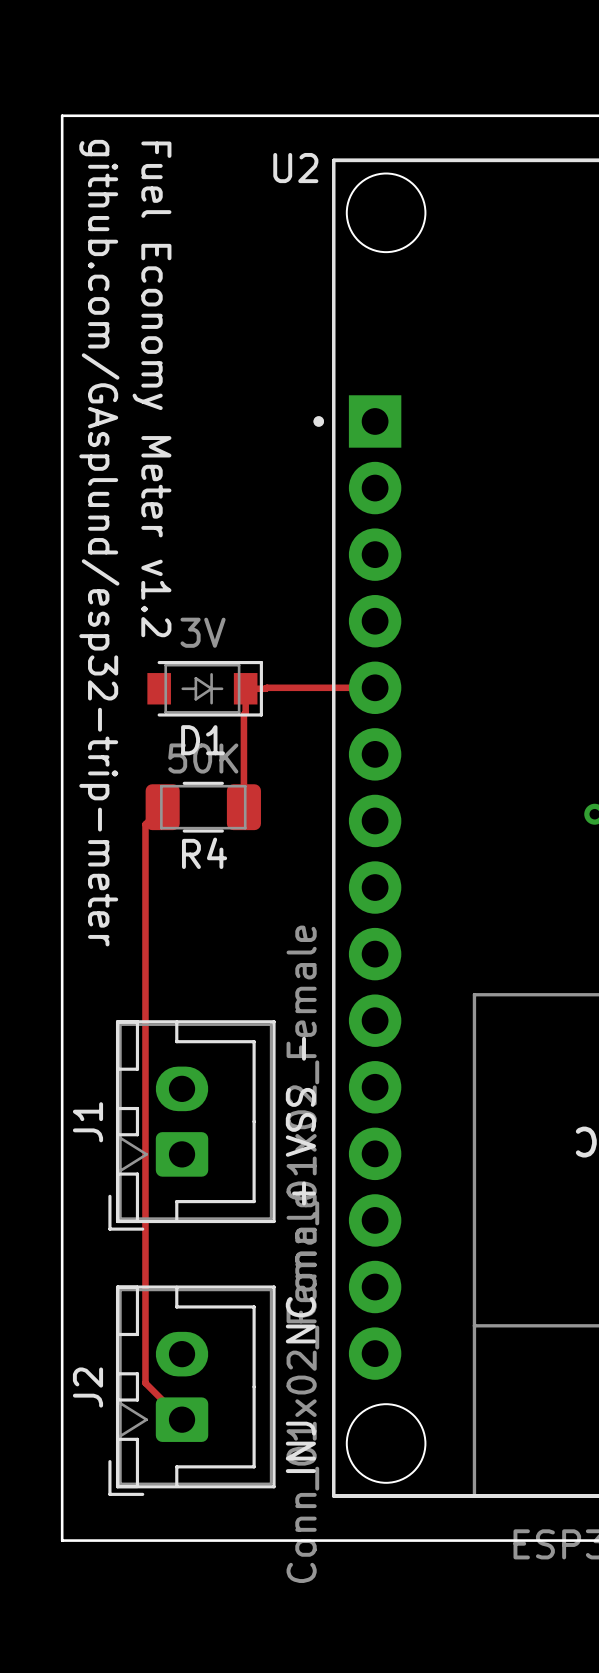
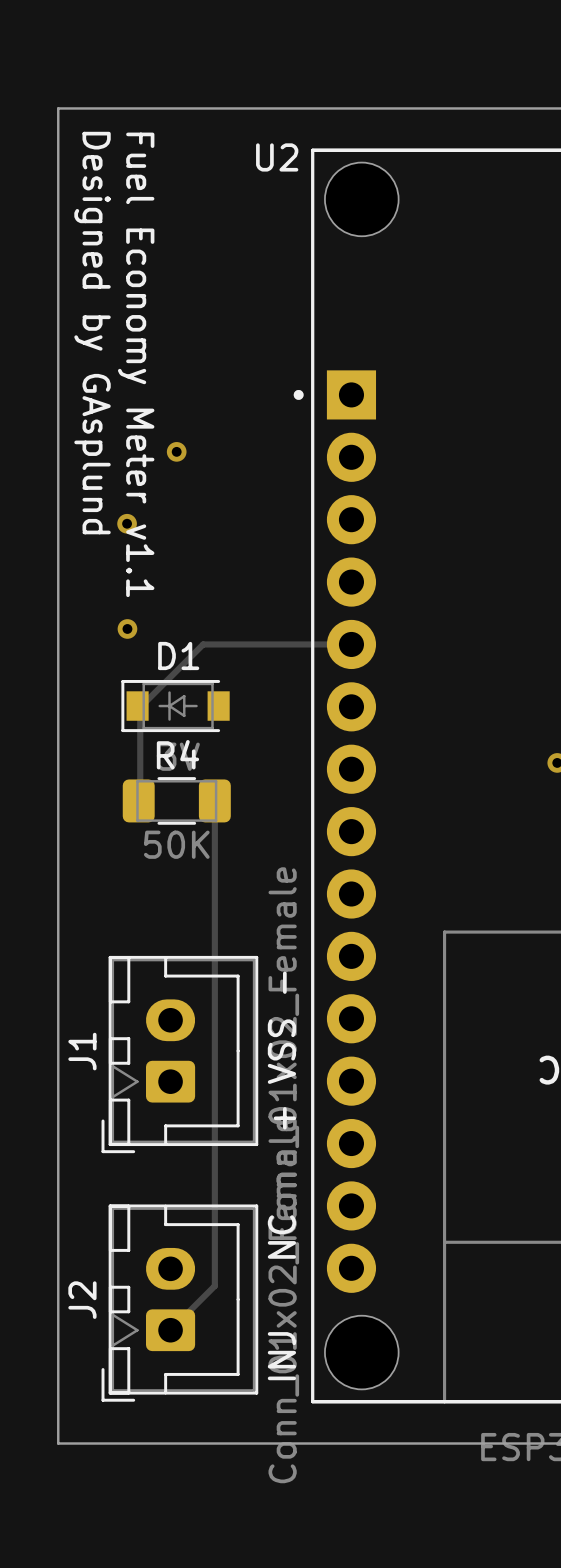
text: none -> Designed by GAsplund (92, 333)
text: Fuel Economy Meter v1.2 (152, 389) -> Fuel Economy Meter v1.1 (136, 364)
via: none -> (176, 451)
text: github.com/GAsplund/esp32-trip-meter (99, 543) -> none
via: none -> (127, 523)
via: none -> (127, 628)
track: (266, 687) (245, 688) (243, 807) -> (250, 644) (203, 644) (140, 707) (140, 799) (138, 800)
D1 rotation: 0° (205, 688) -> 180° (175, 706)
R4 value position: 50K (203, 758) -> 50K (176, 844)
track: (162, 807) (145, 824) (145, 1383) (182, 1419) -> (214, 800) (214, 1285) (170, 1330)
R4 position: (203, 807) -> (176, 800)
R4 name position: R4 (204, 853) -> R4 (177, 754)

